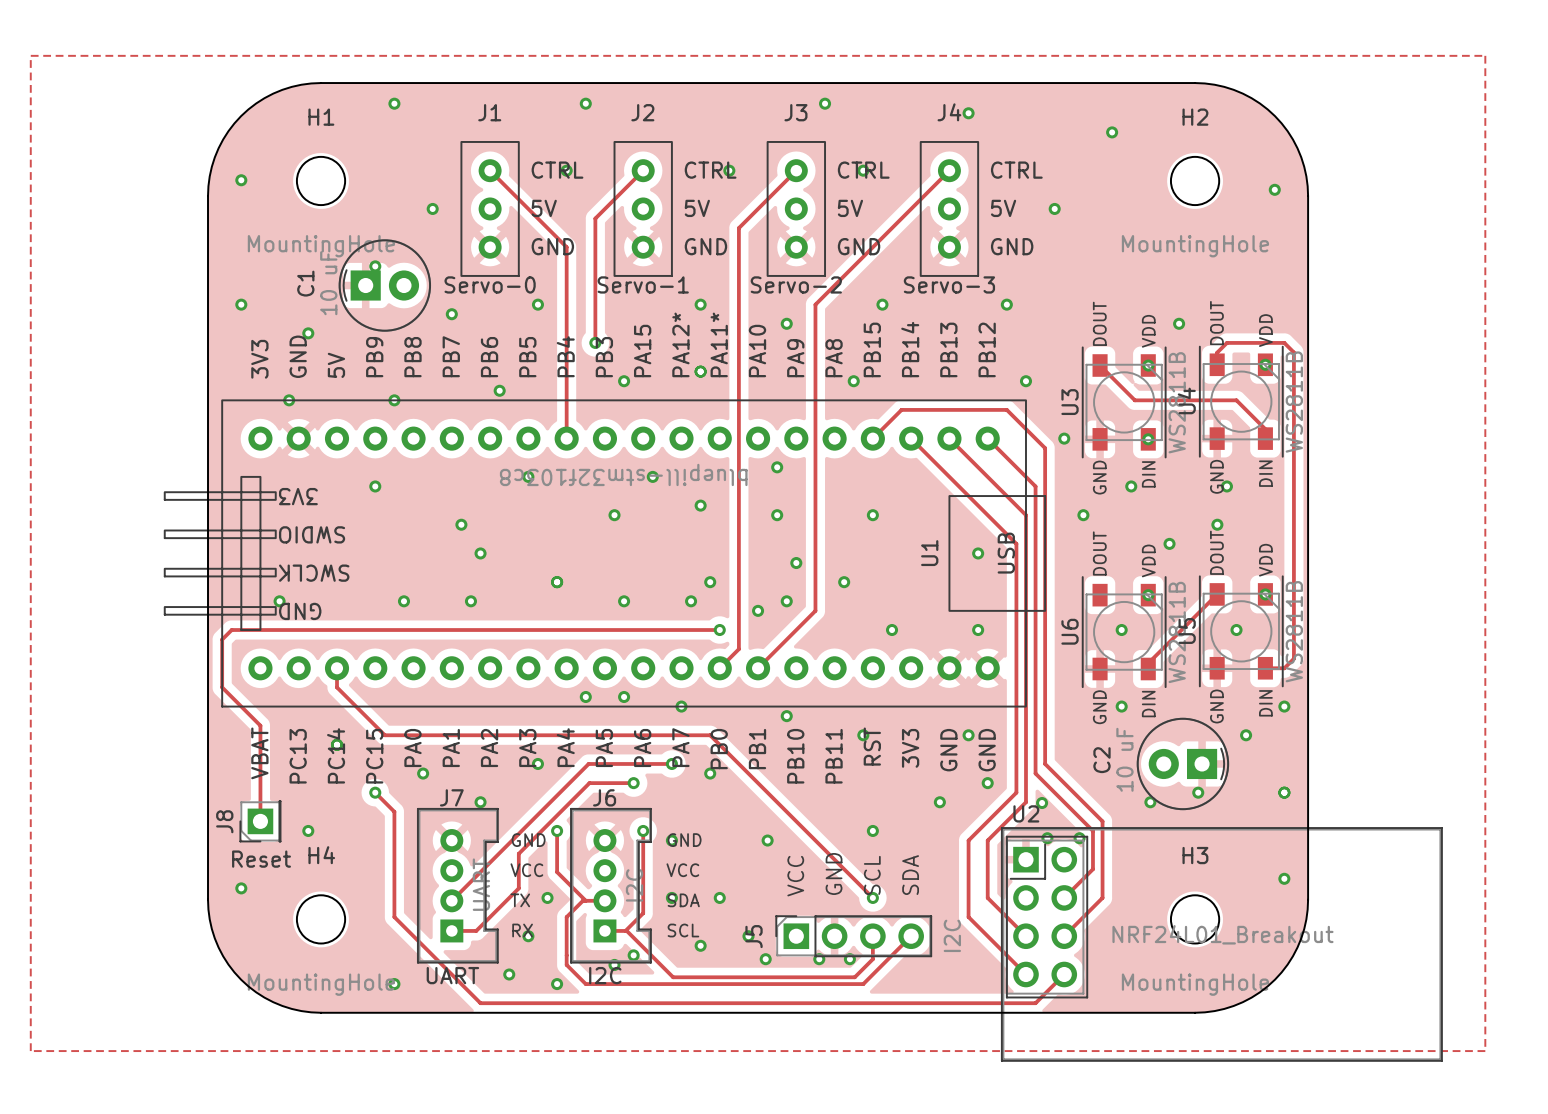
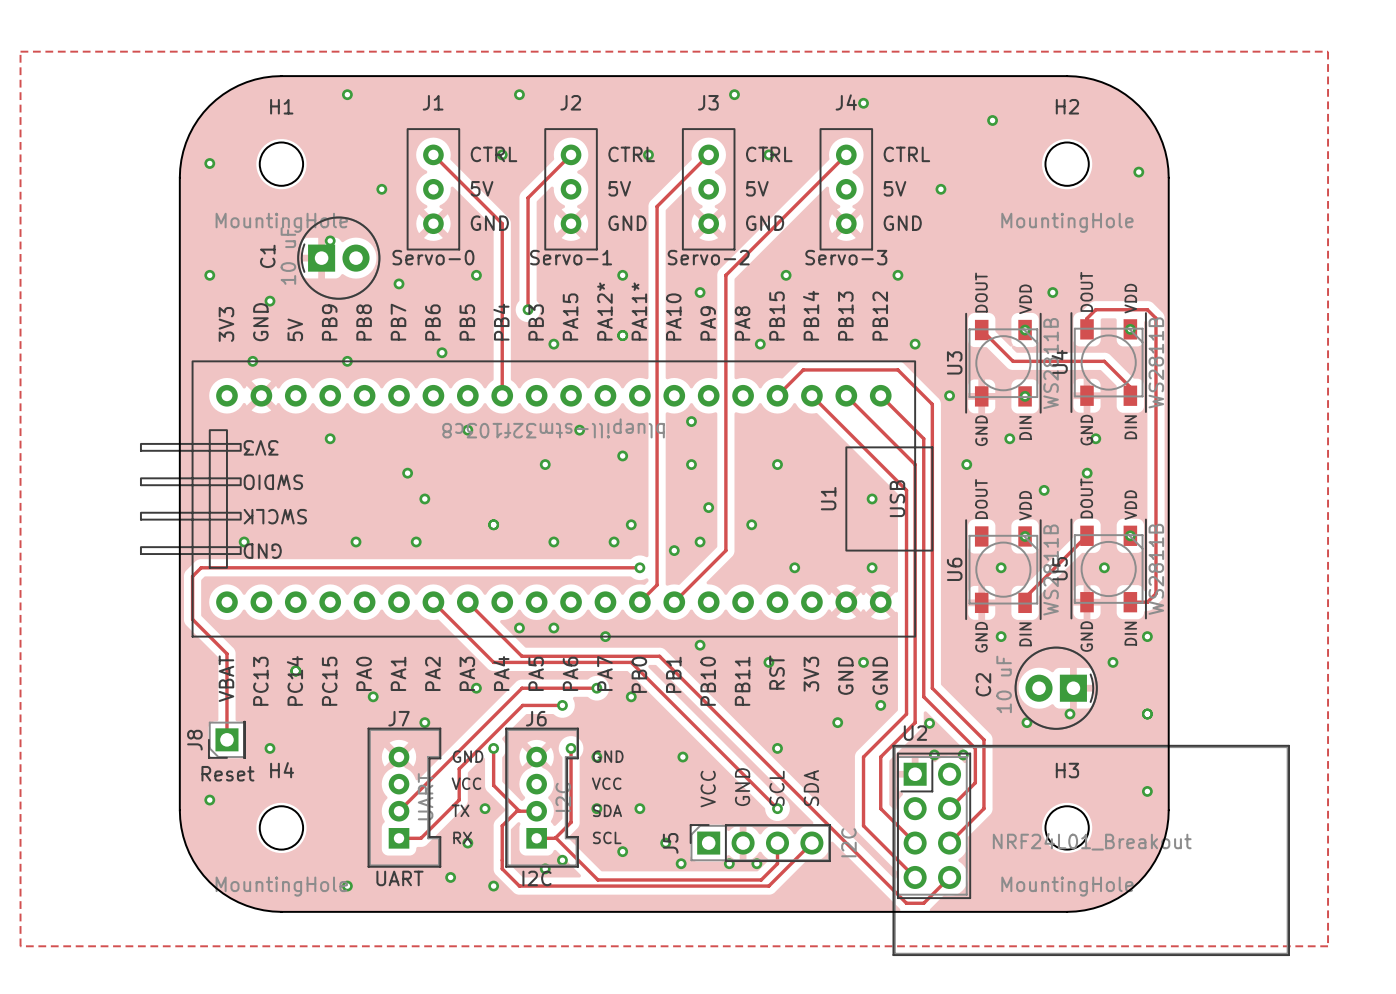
track: (337, 668) (337, 687) (384, 735) (557, 735) -> (433, 602) (493, 662)
track: (375, 792) (394, 811) (394, 917) (480, 1003) (1016, 1003) -> (467, 602) (521, 656) (659, 656) (906, 903)
via: (375, 792) -> none

